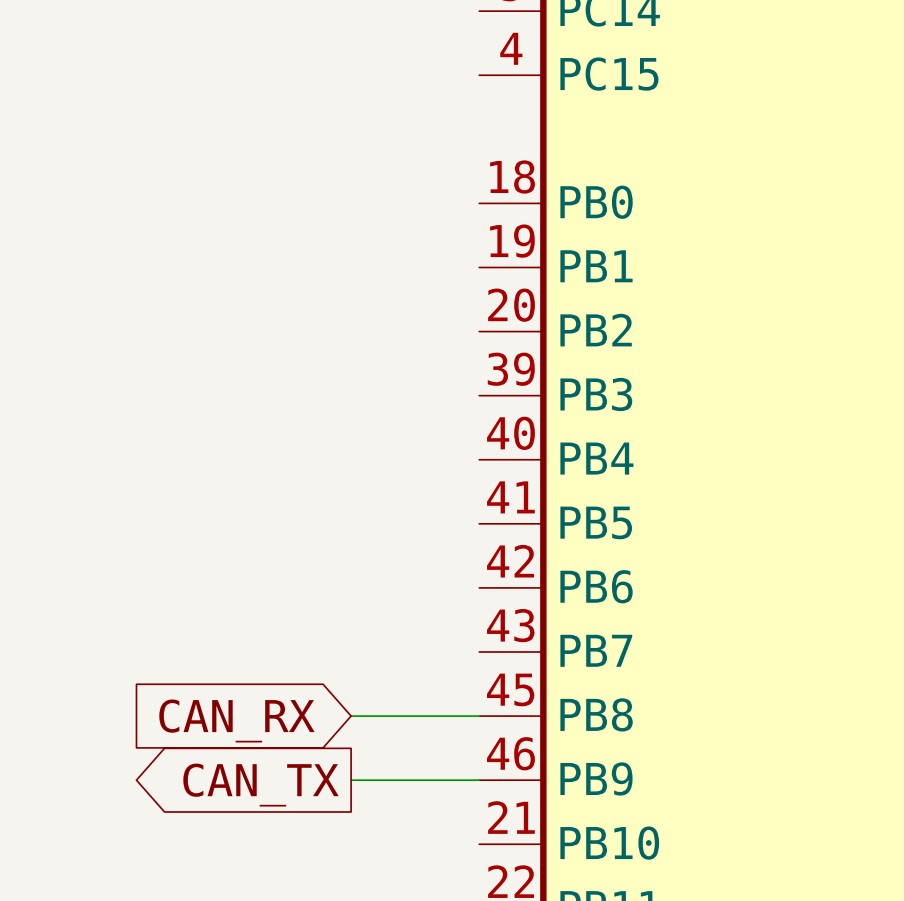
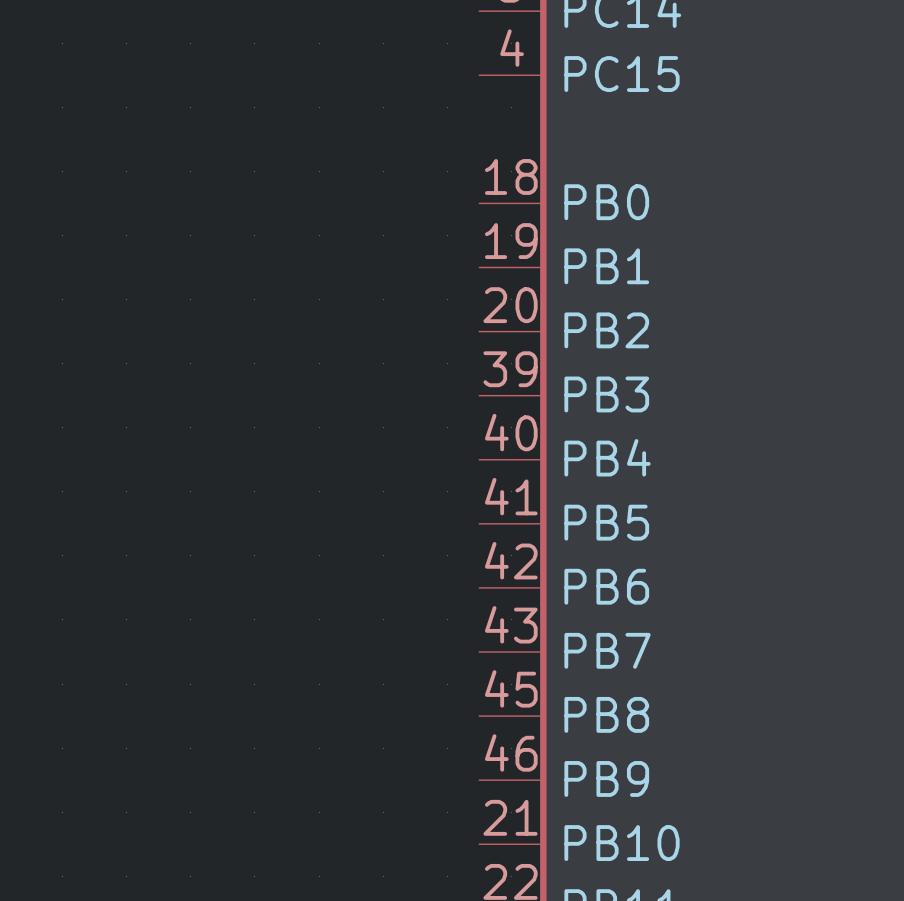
wire: (351, 716) (479, 716) -> none
global label: CAN_RX (236, 720) -> none
wire: (351, 780) (479, 780) -> none
global label: CAN_TX (260, 785) -> none

